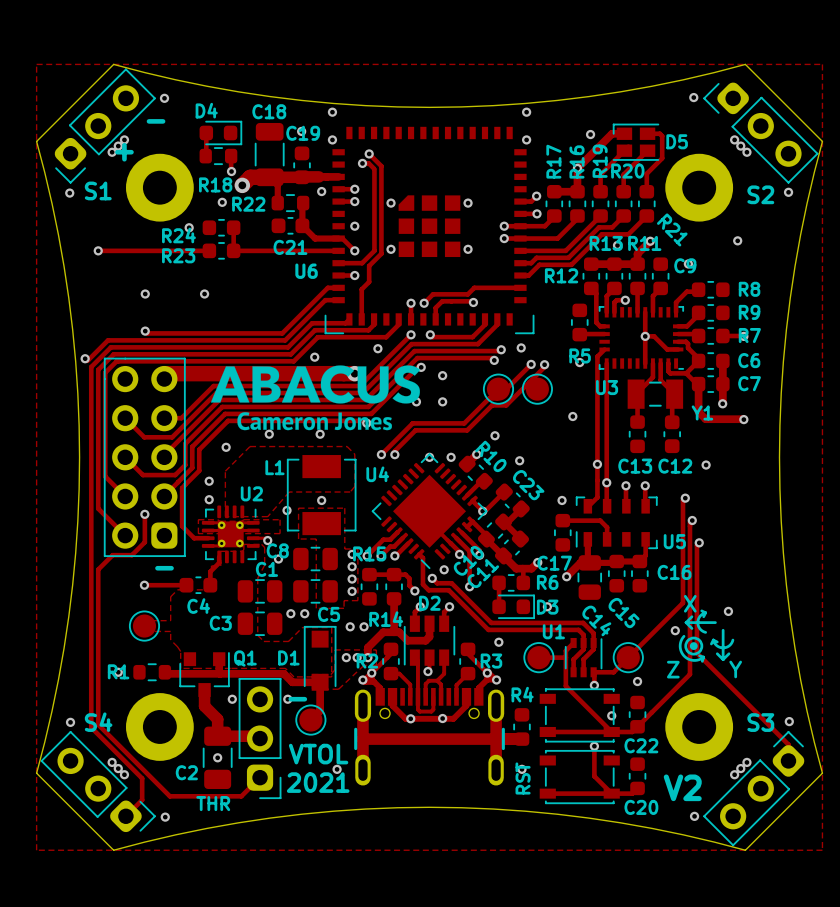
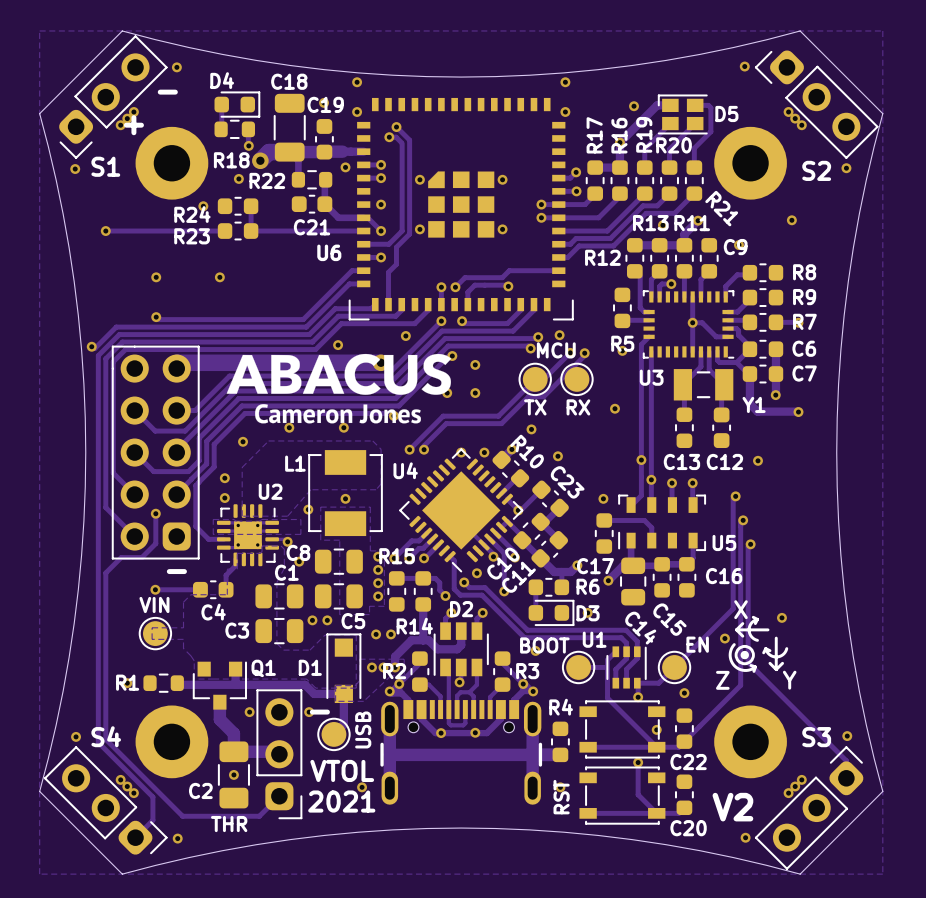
text: none -> MCU (556, 350)
TX name: none -> TX (535, 407)
RX name: none -> RX (578, 407)
VIN name: none -> VIN (154, 604)
text: none -> EN (697, 644)
text: none -> BOOT (544, 645)
USB name: none -> USB (363, 729)

